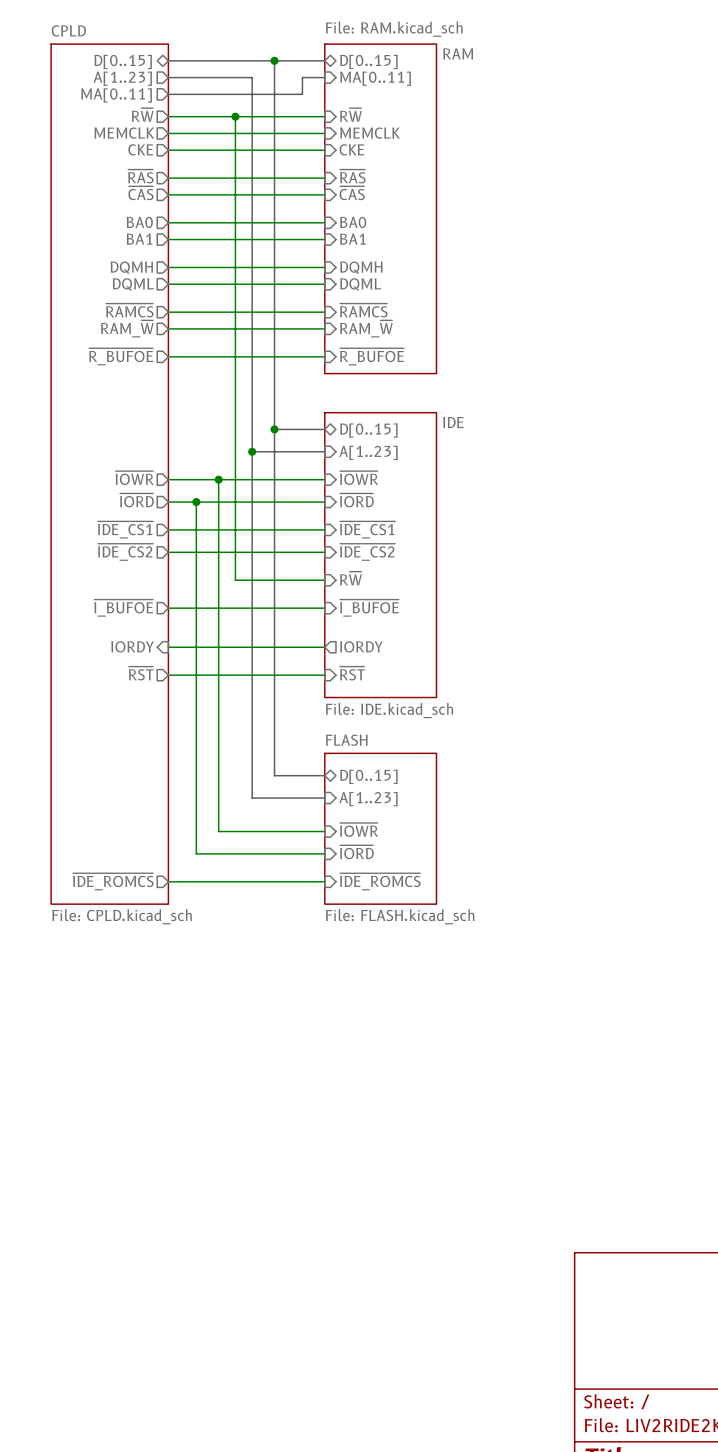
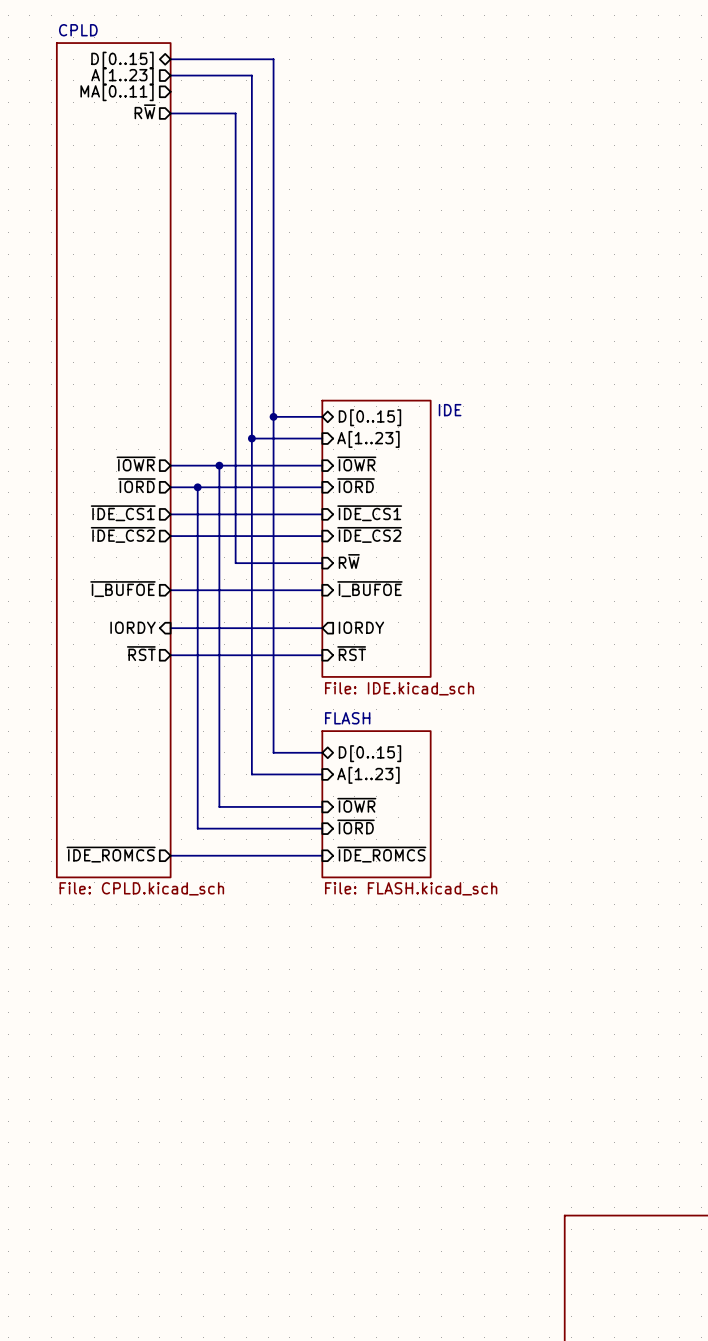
bus: (274, 60) (324, 60) -> none
junction: (274, 60) -> none
sheet pin: D[0..15] (368, 61) -> none
bus: (324, 77) (302, 77) (302, 94) (168, 94) -> none
sheet pin: MA[0..11] (375, 78) -> none
sheet pin: R~{W} (350, 114) -> none
wire: (235, 116) (324, 116) -> none
junction: (235, 116) -> none
sheet pin: MEMCLK (124, 133) -> none
wire: (168, 133) (324, 133) -> none
sheet pin: MEMCLK (370, 133) -> none
sheet pin: CKE (140, 149) -> none
sheet pin: CKE (351, 149) -> none
wire: (168, 150) (324, 150) -> none
sheet pin: ~{RAS} (140, 176) -> none
sheet pin: ~{RAS} (352, 176) -> none
wire: (168, 178) (324, 178) -> none
sheet pin: ~{CAS} (140, 193) -> none
sheet pin: ~{CAS} (352, 193) -> none
wire: (168, 194) (324, 194) -> none
sheet RAM: File: RAM.kicad_sch (380, 208) -> none
sheet pin: BA0 (139, 222) -> none
wire: (168, 222) (324, 222) -> none
sheet pin: BA0 (353, 222) -> none
sheet pin: BA1 (139, 239) -> none
wire: (168, 239) (324, 239) -> none
sheet pin: BA1 (352, 239) -> none
sheet pin: DQMH (131, 267) -> none
wire: (168, 267) (324, 267) -> none
sheet pin: DQMH (361, 267) -> none
sheet pin: DQML (133, 284) -> none
wire: (168, 284) (324, 284) -> none
sheet pin: DQML (360, 284) -> none
sheet pin: ~{RAMCS} (129, 310) -> none
sheet pin: ~{RAMCS} (363, 310) -> none
wire: (168, 312) (324, 312) -> none
sheet pin: RAM_~{W} (127, 328) -> none
wire: (168, 328) (324, 328) -> none
sheet pin: RAM_~{W} (366, 328) -> none
sheet pin: ~{R_BUFOE} (121, 356) -> none
wire: (168, 356) (324, 356) -> none
sheet pin: ~{R_BUFOE} (372, 356) -> none

